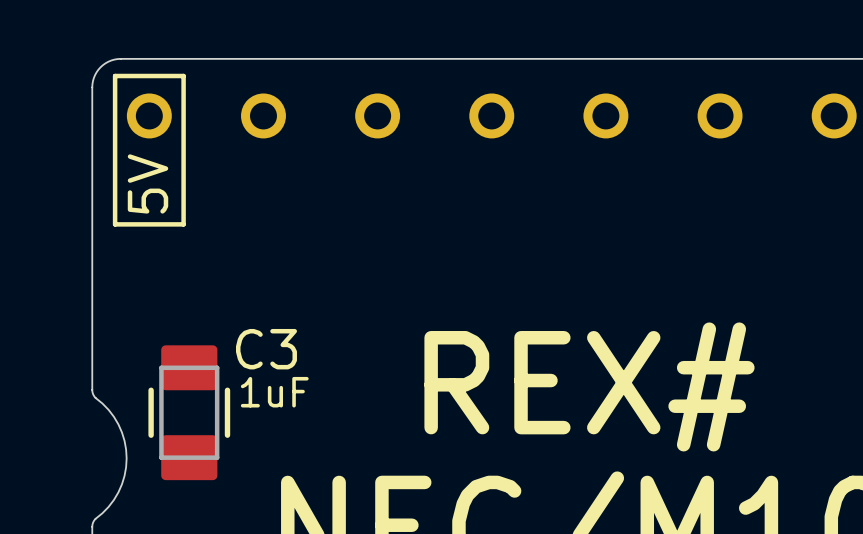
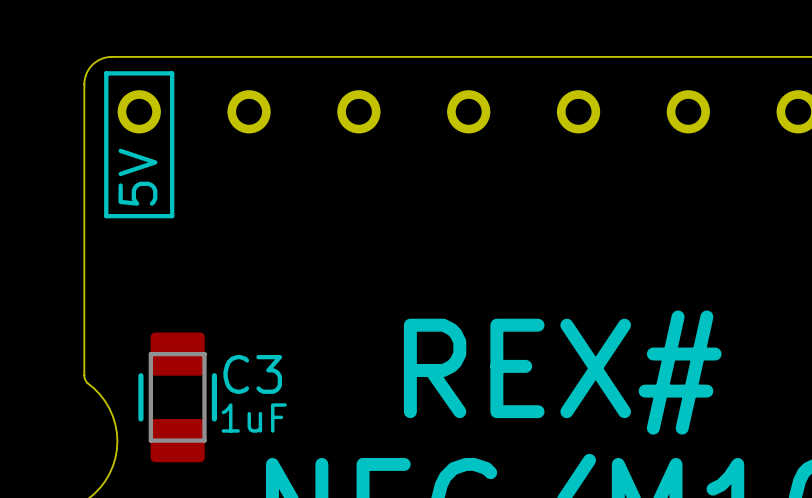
C3 name position: C3 (266, 349) -> C3 (252, 374)
C3 value position: 1uF (274, 392) -> 1uF (254, 418)

